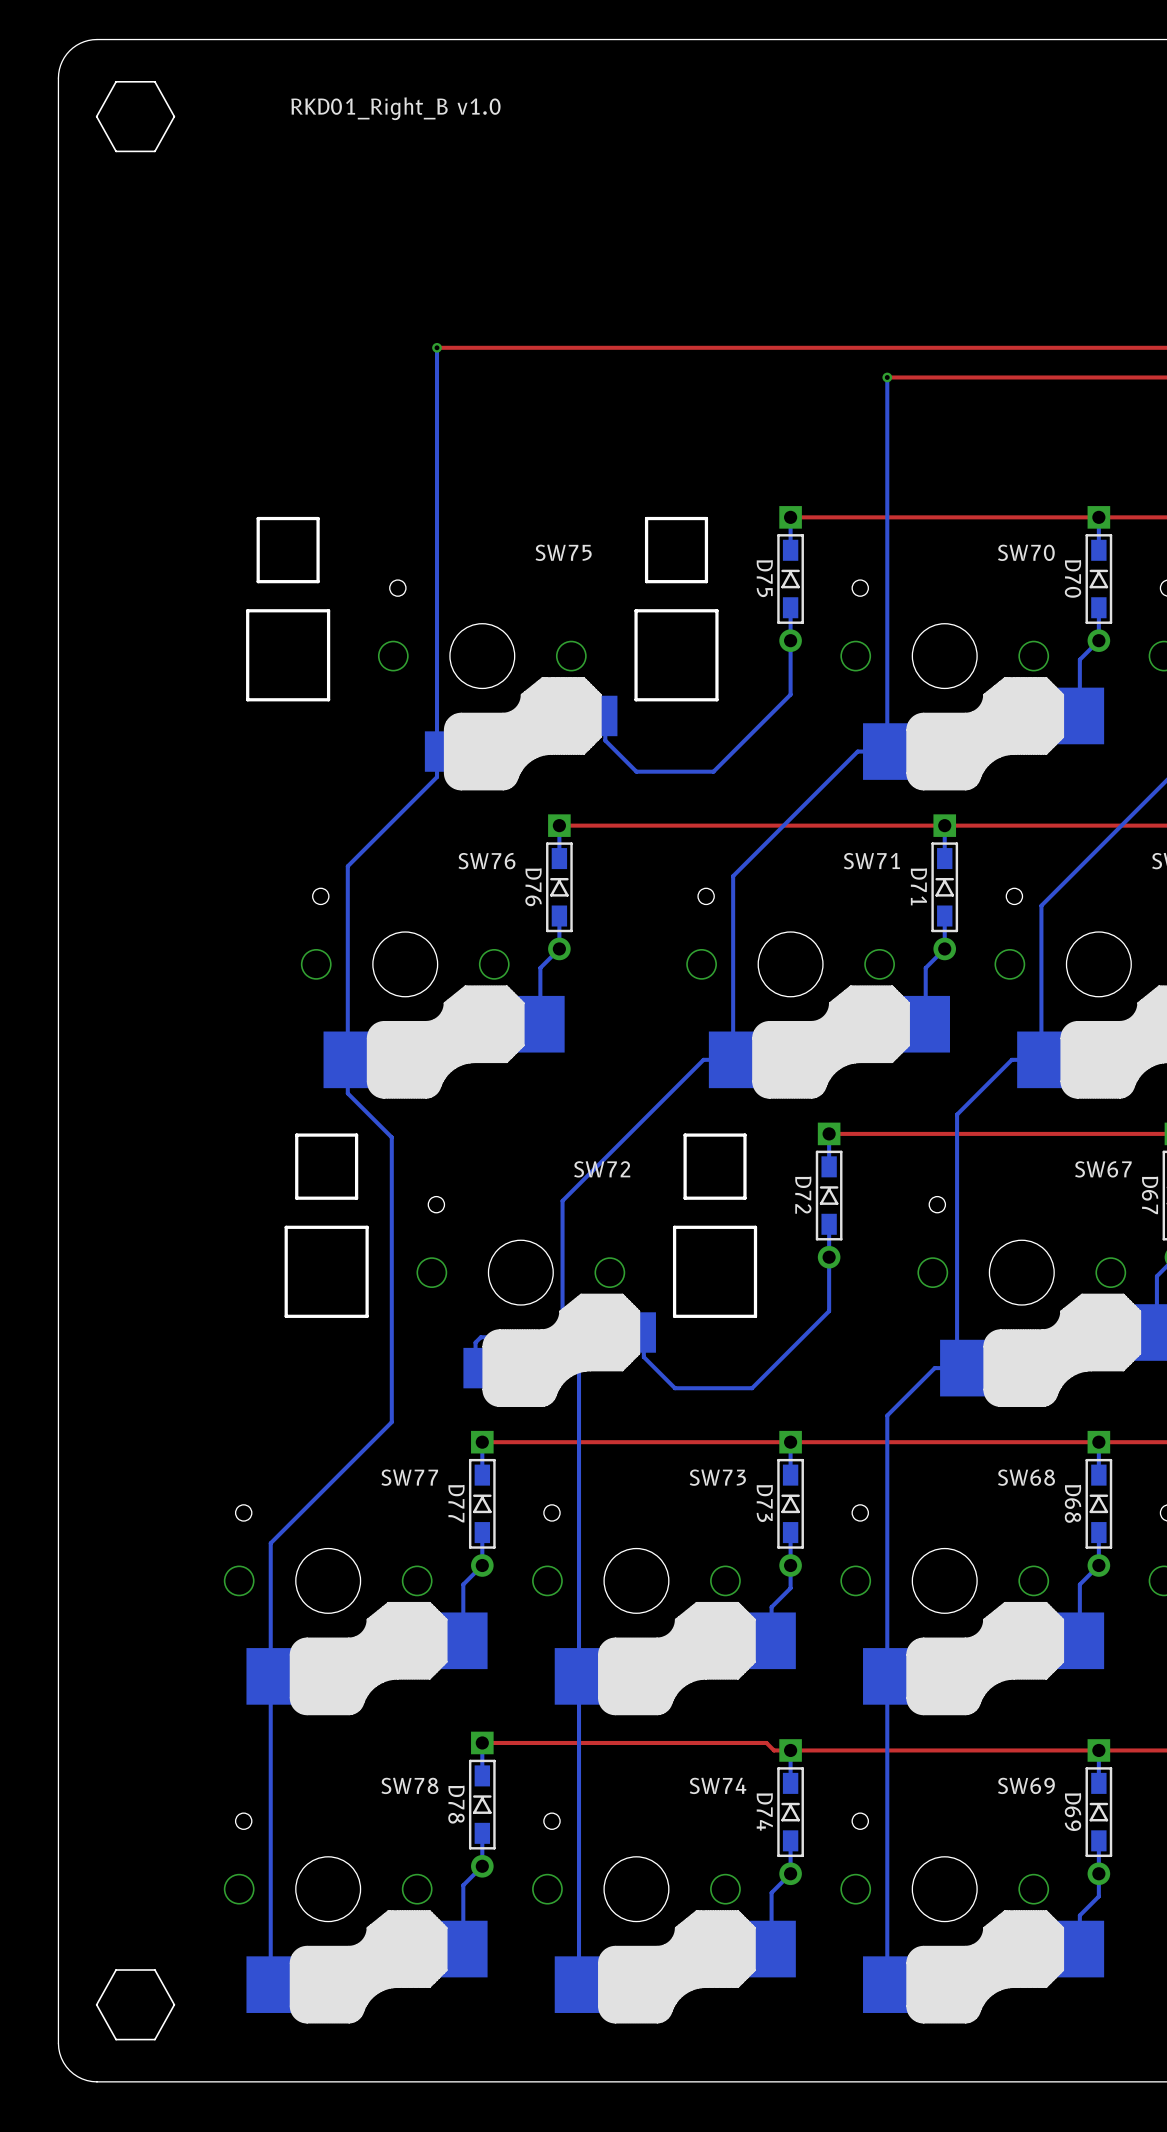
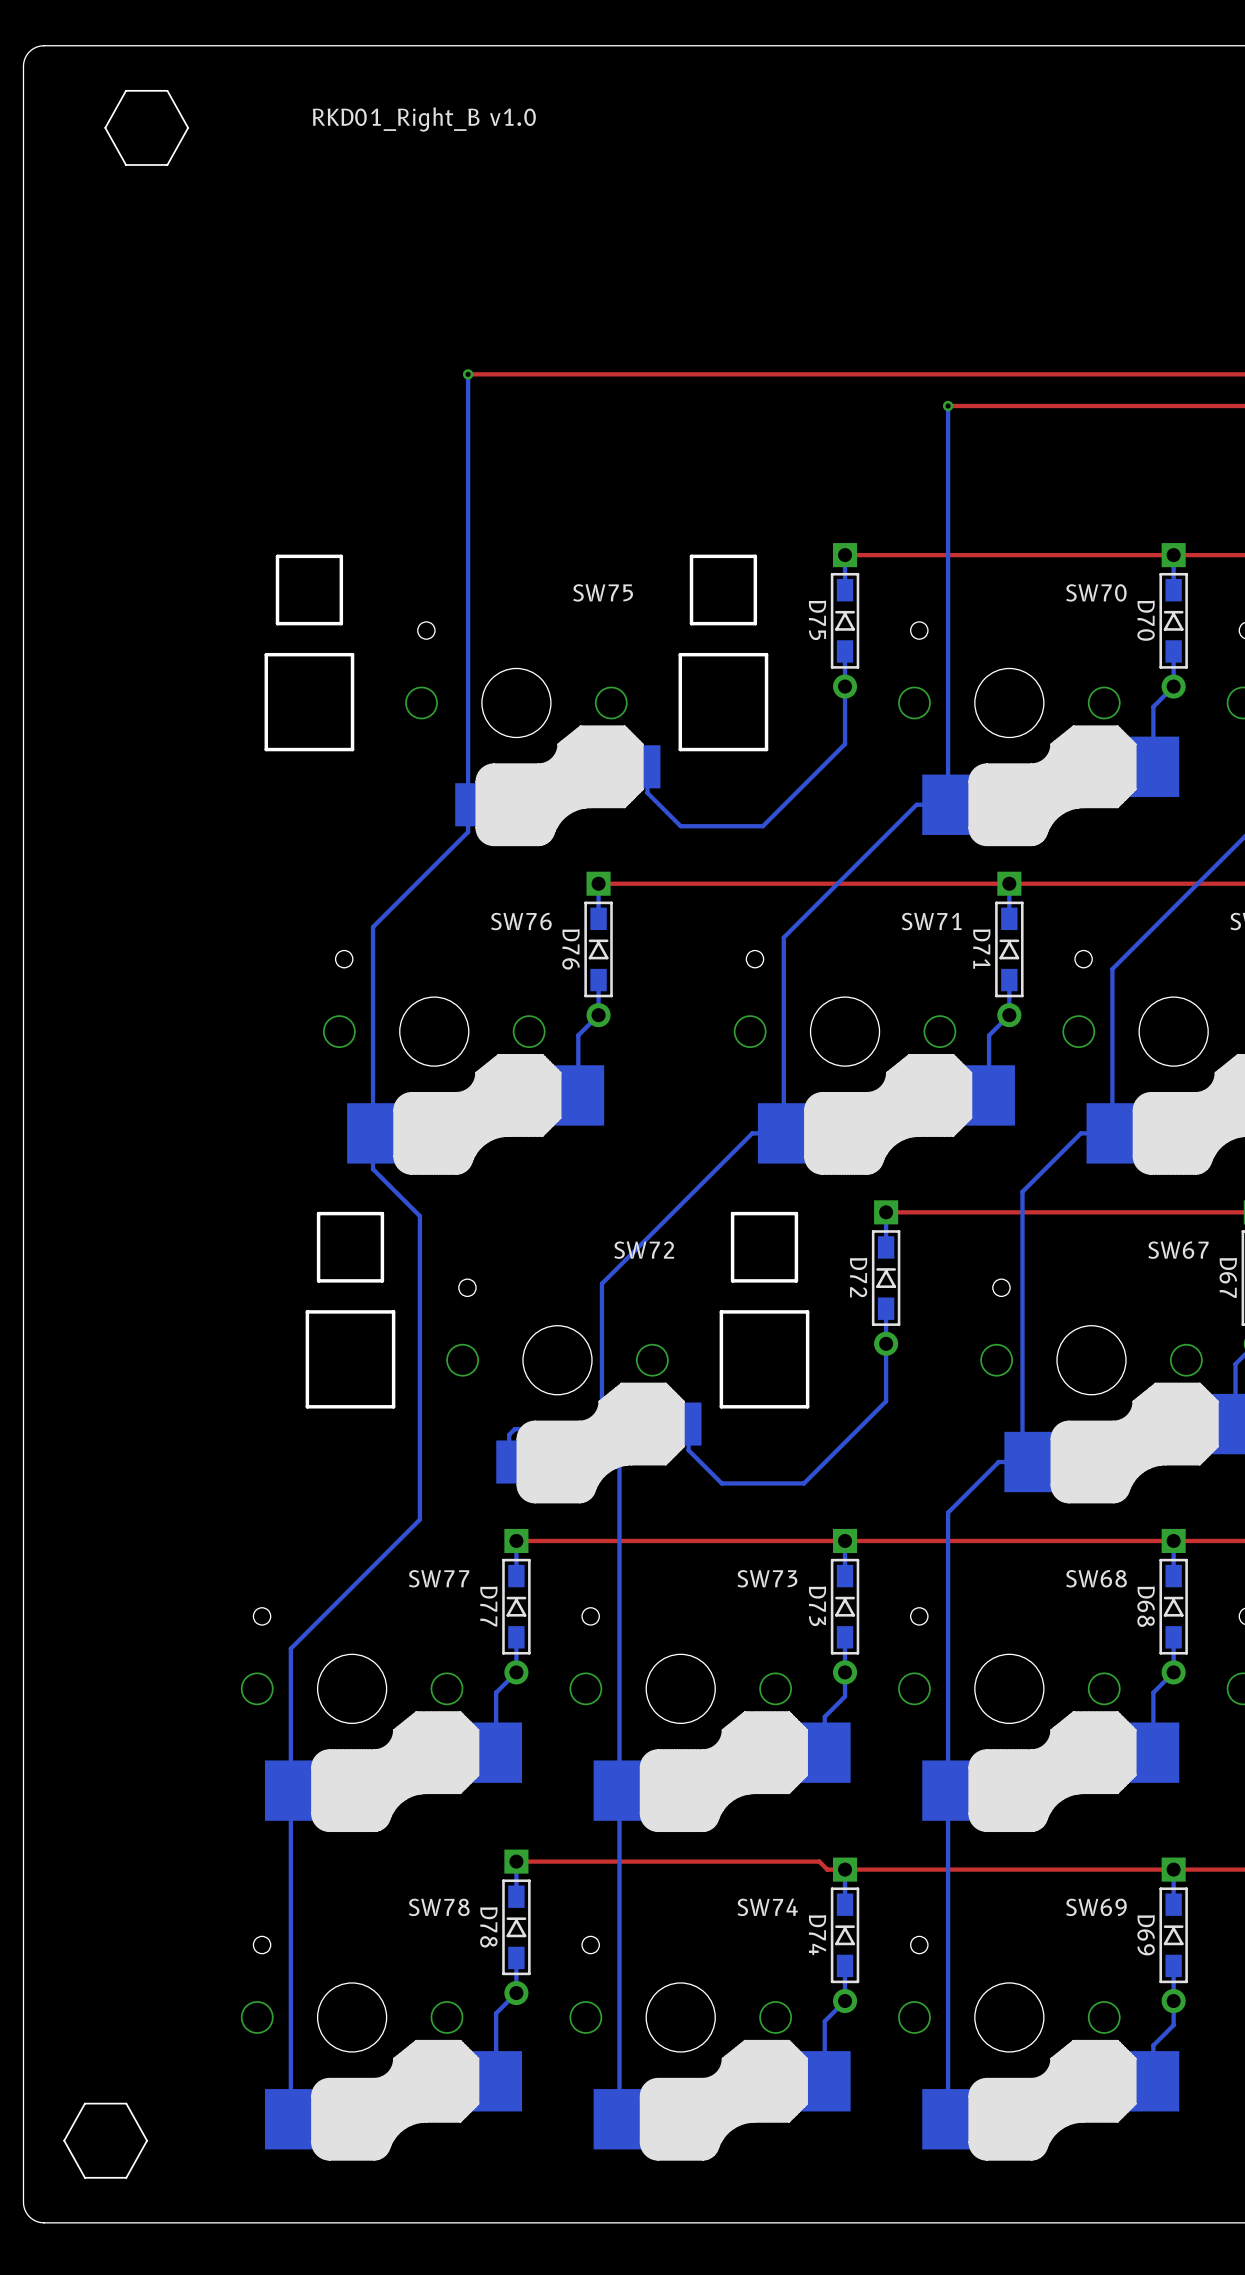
board edge: (96, 39) (80, 43) (69, 50) (62, 61) (58, 78) (58, 2043) (61, 2058) (69, 2070) (82, 2078) (96, 2081) -> (105, 45) (38, 46) (27, 53) (23, 66) (23, 2202) (27, 2214) (38, 2222) (105, 2222)
drawing position: (135, 2004) -> (105, 2140)

